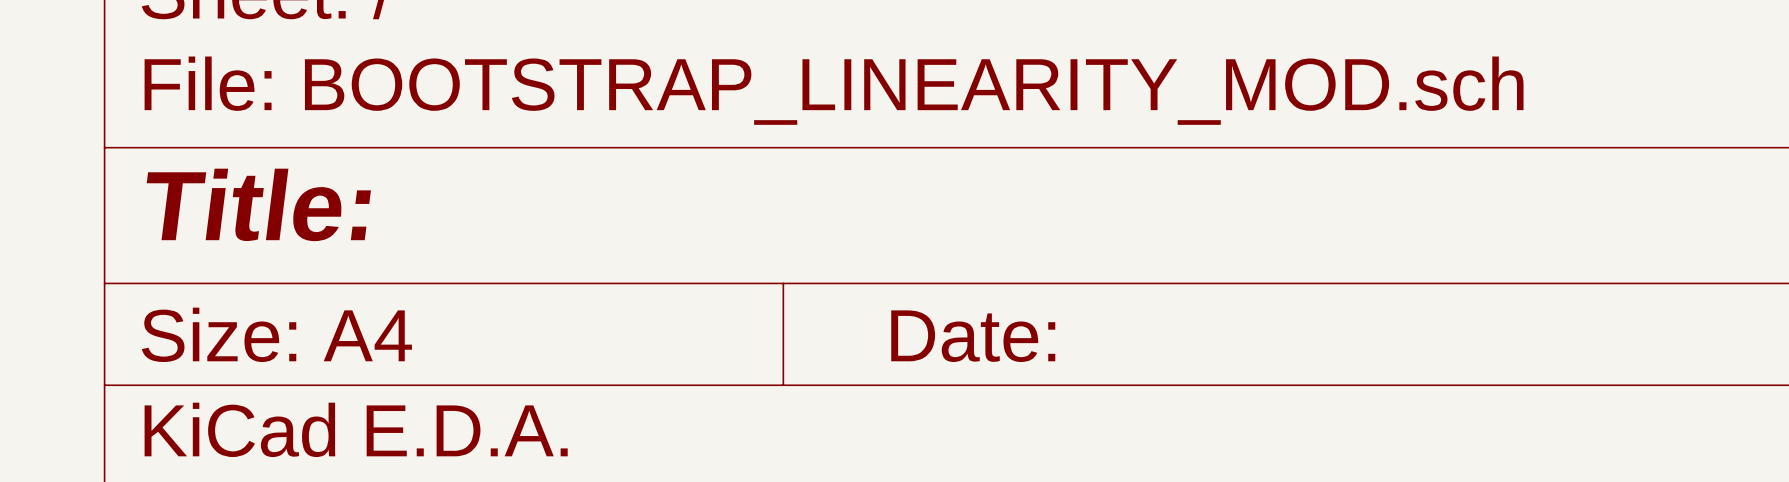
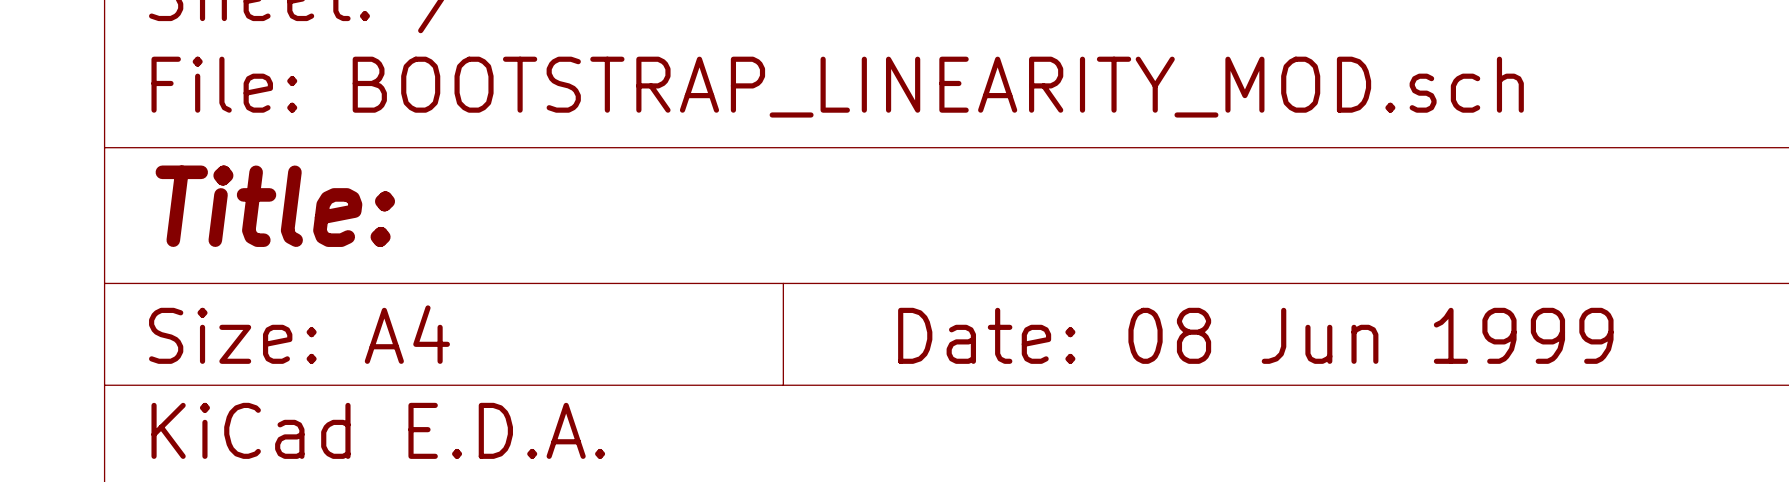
title block: Date: (973, 336) -> Date: 08 Jun 1999 (1255, 335)

